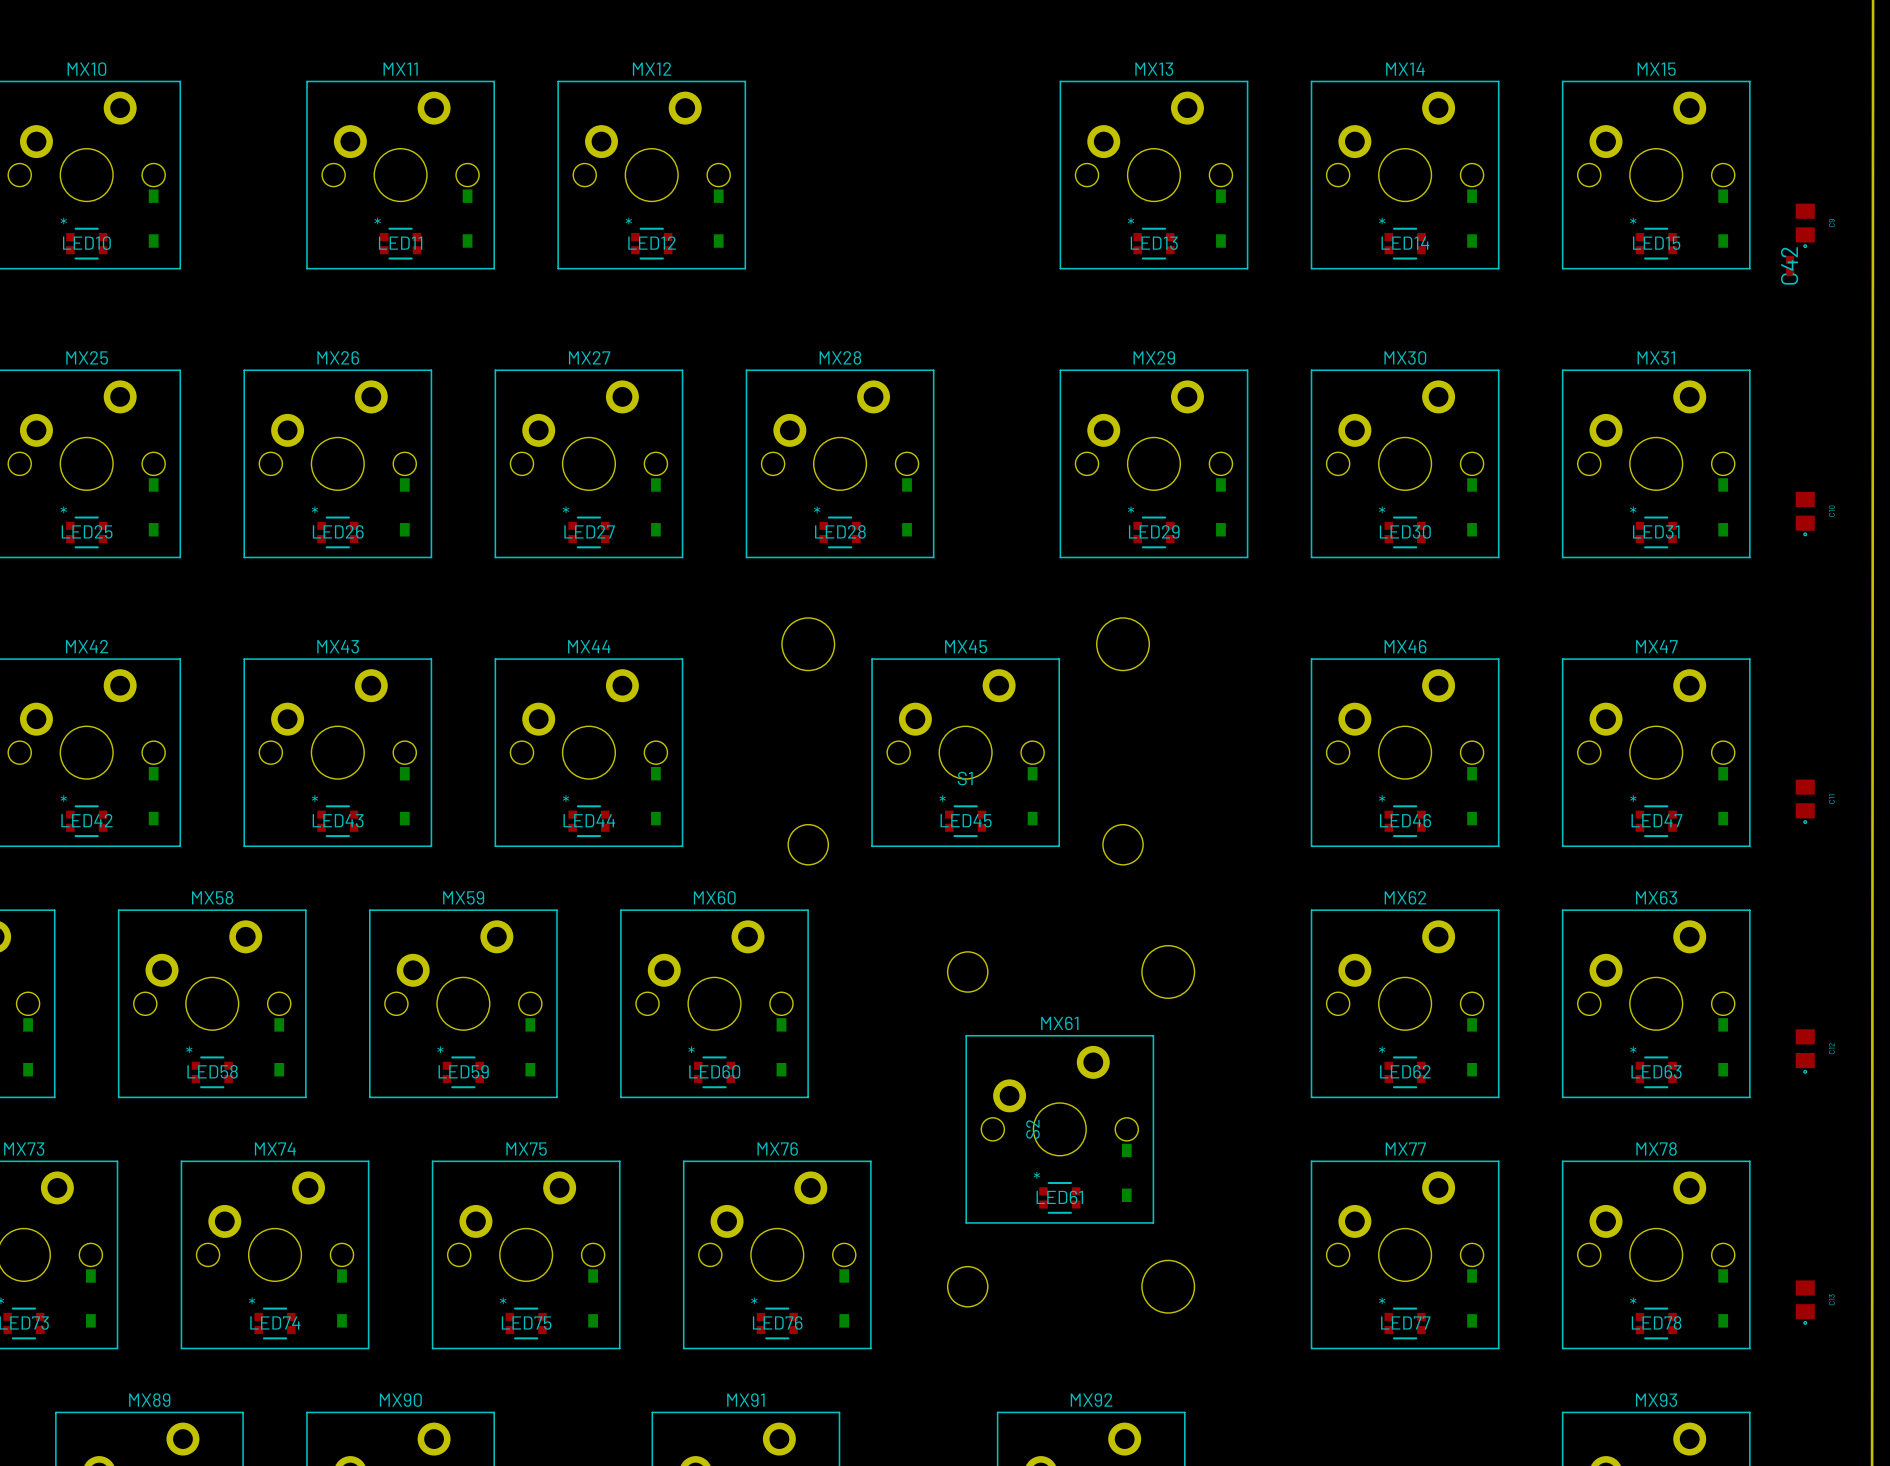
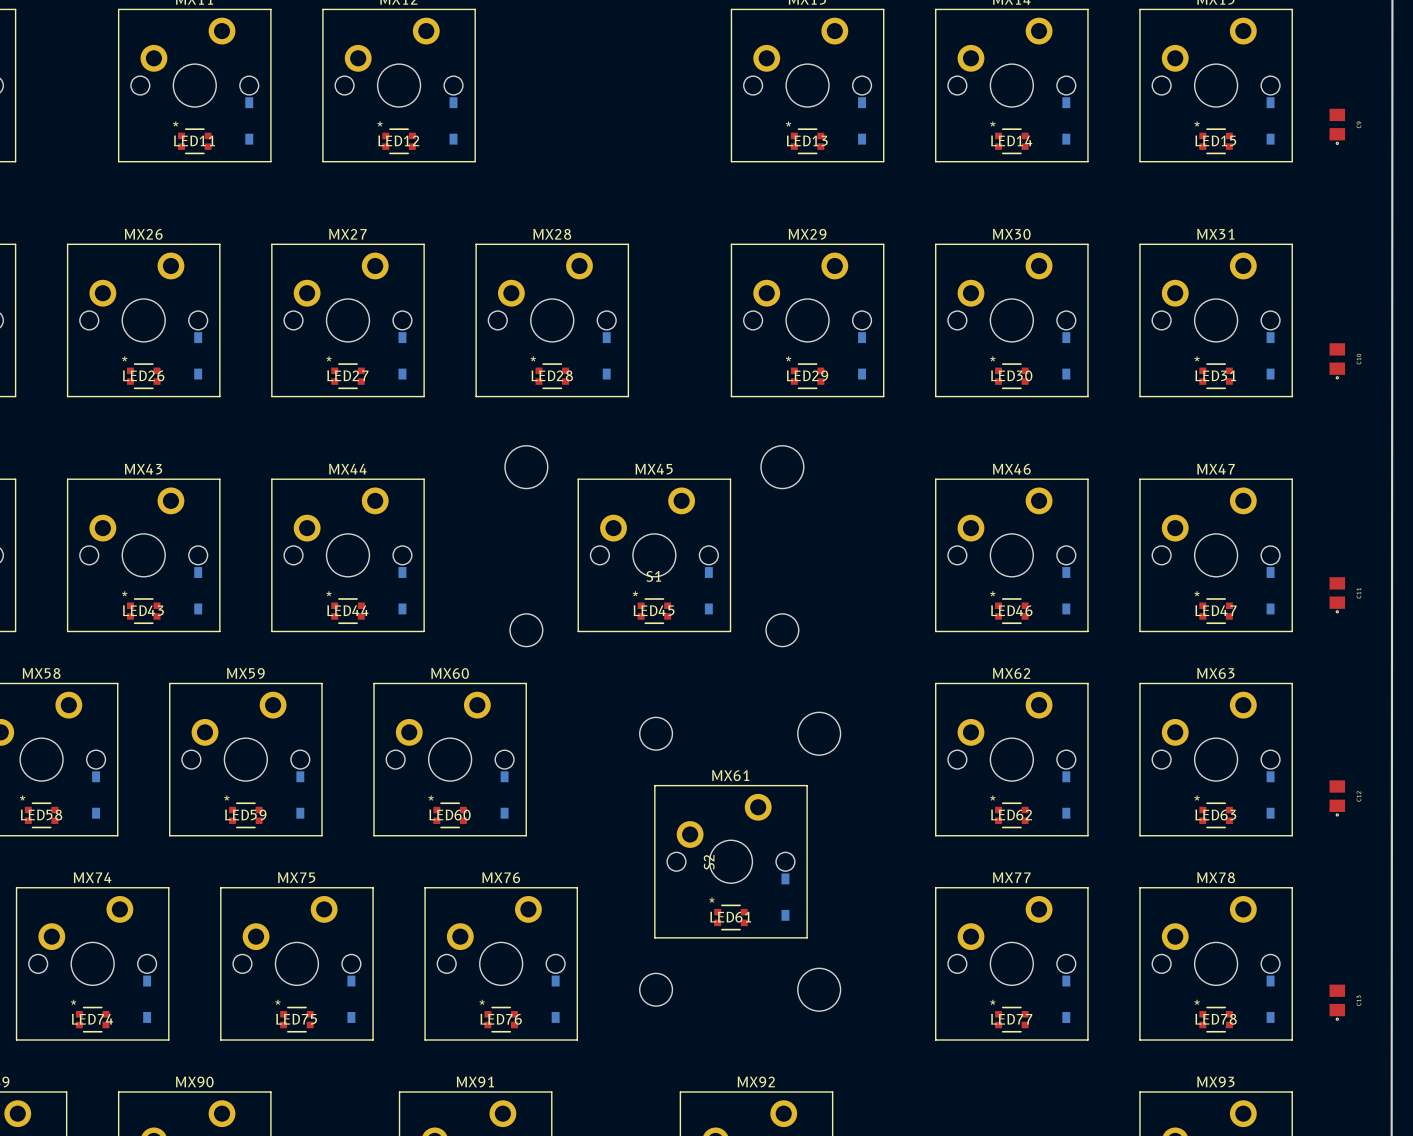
C42: (1790, 266) -> none

